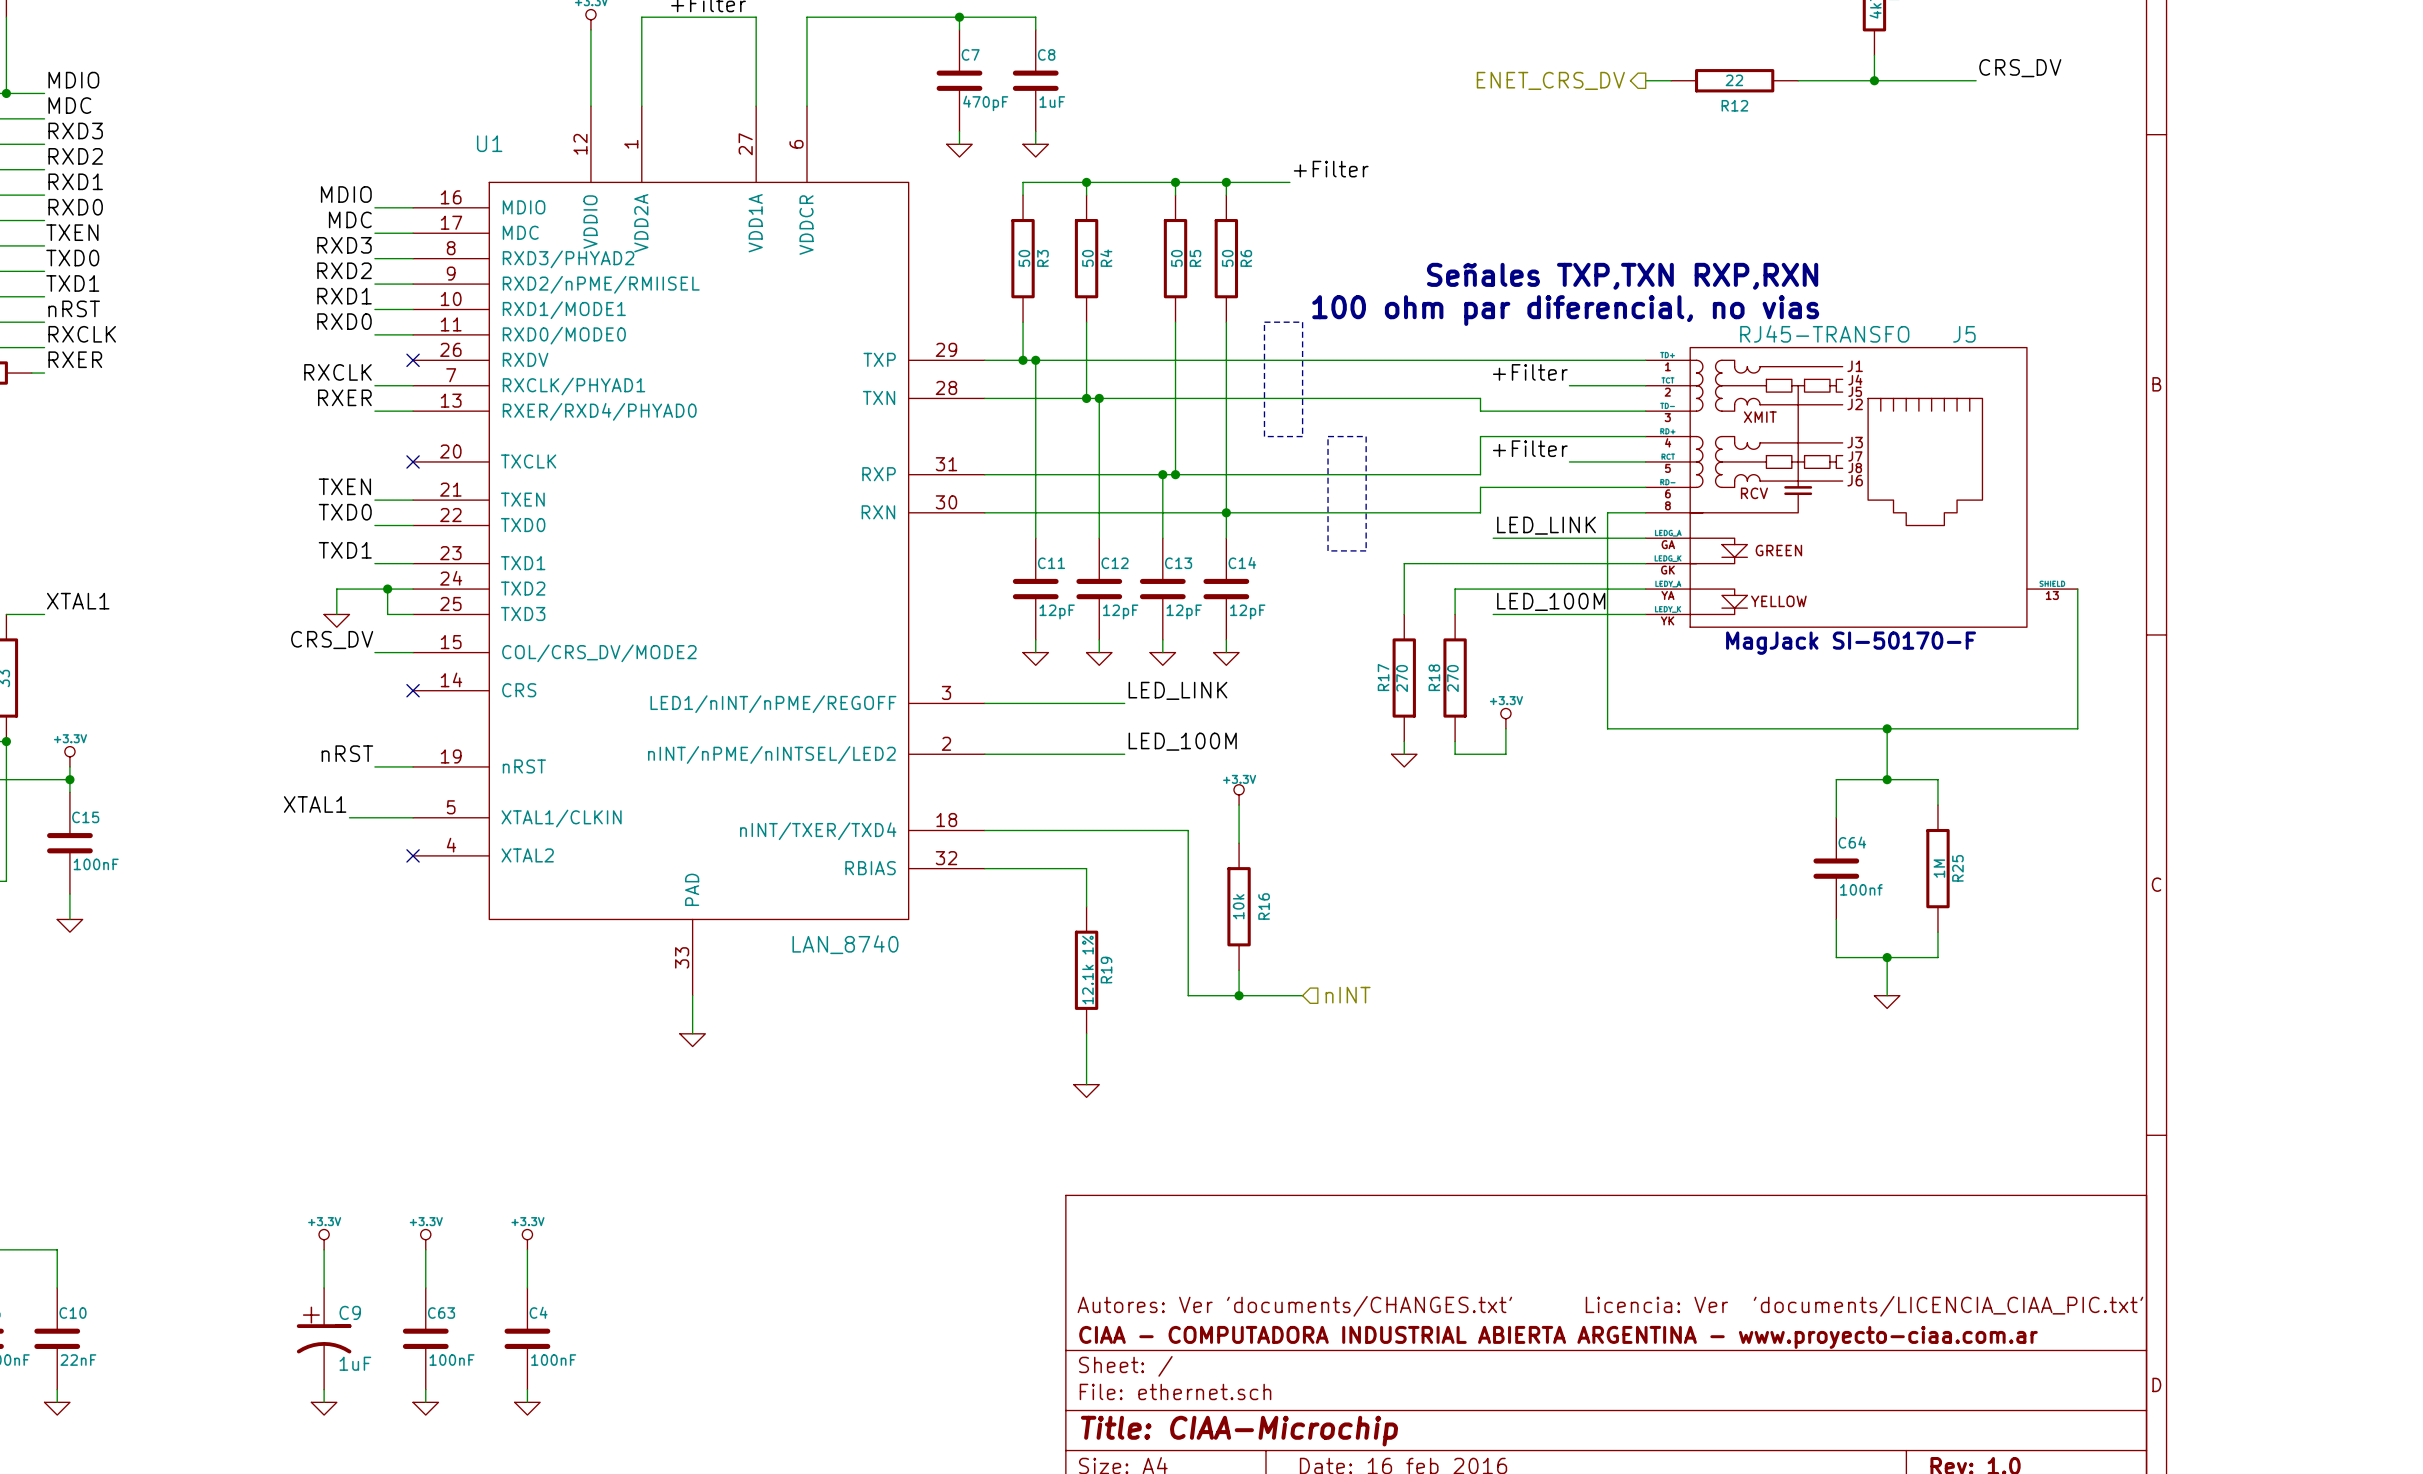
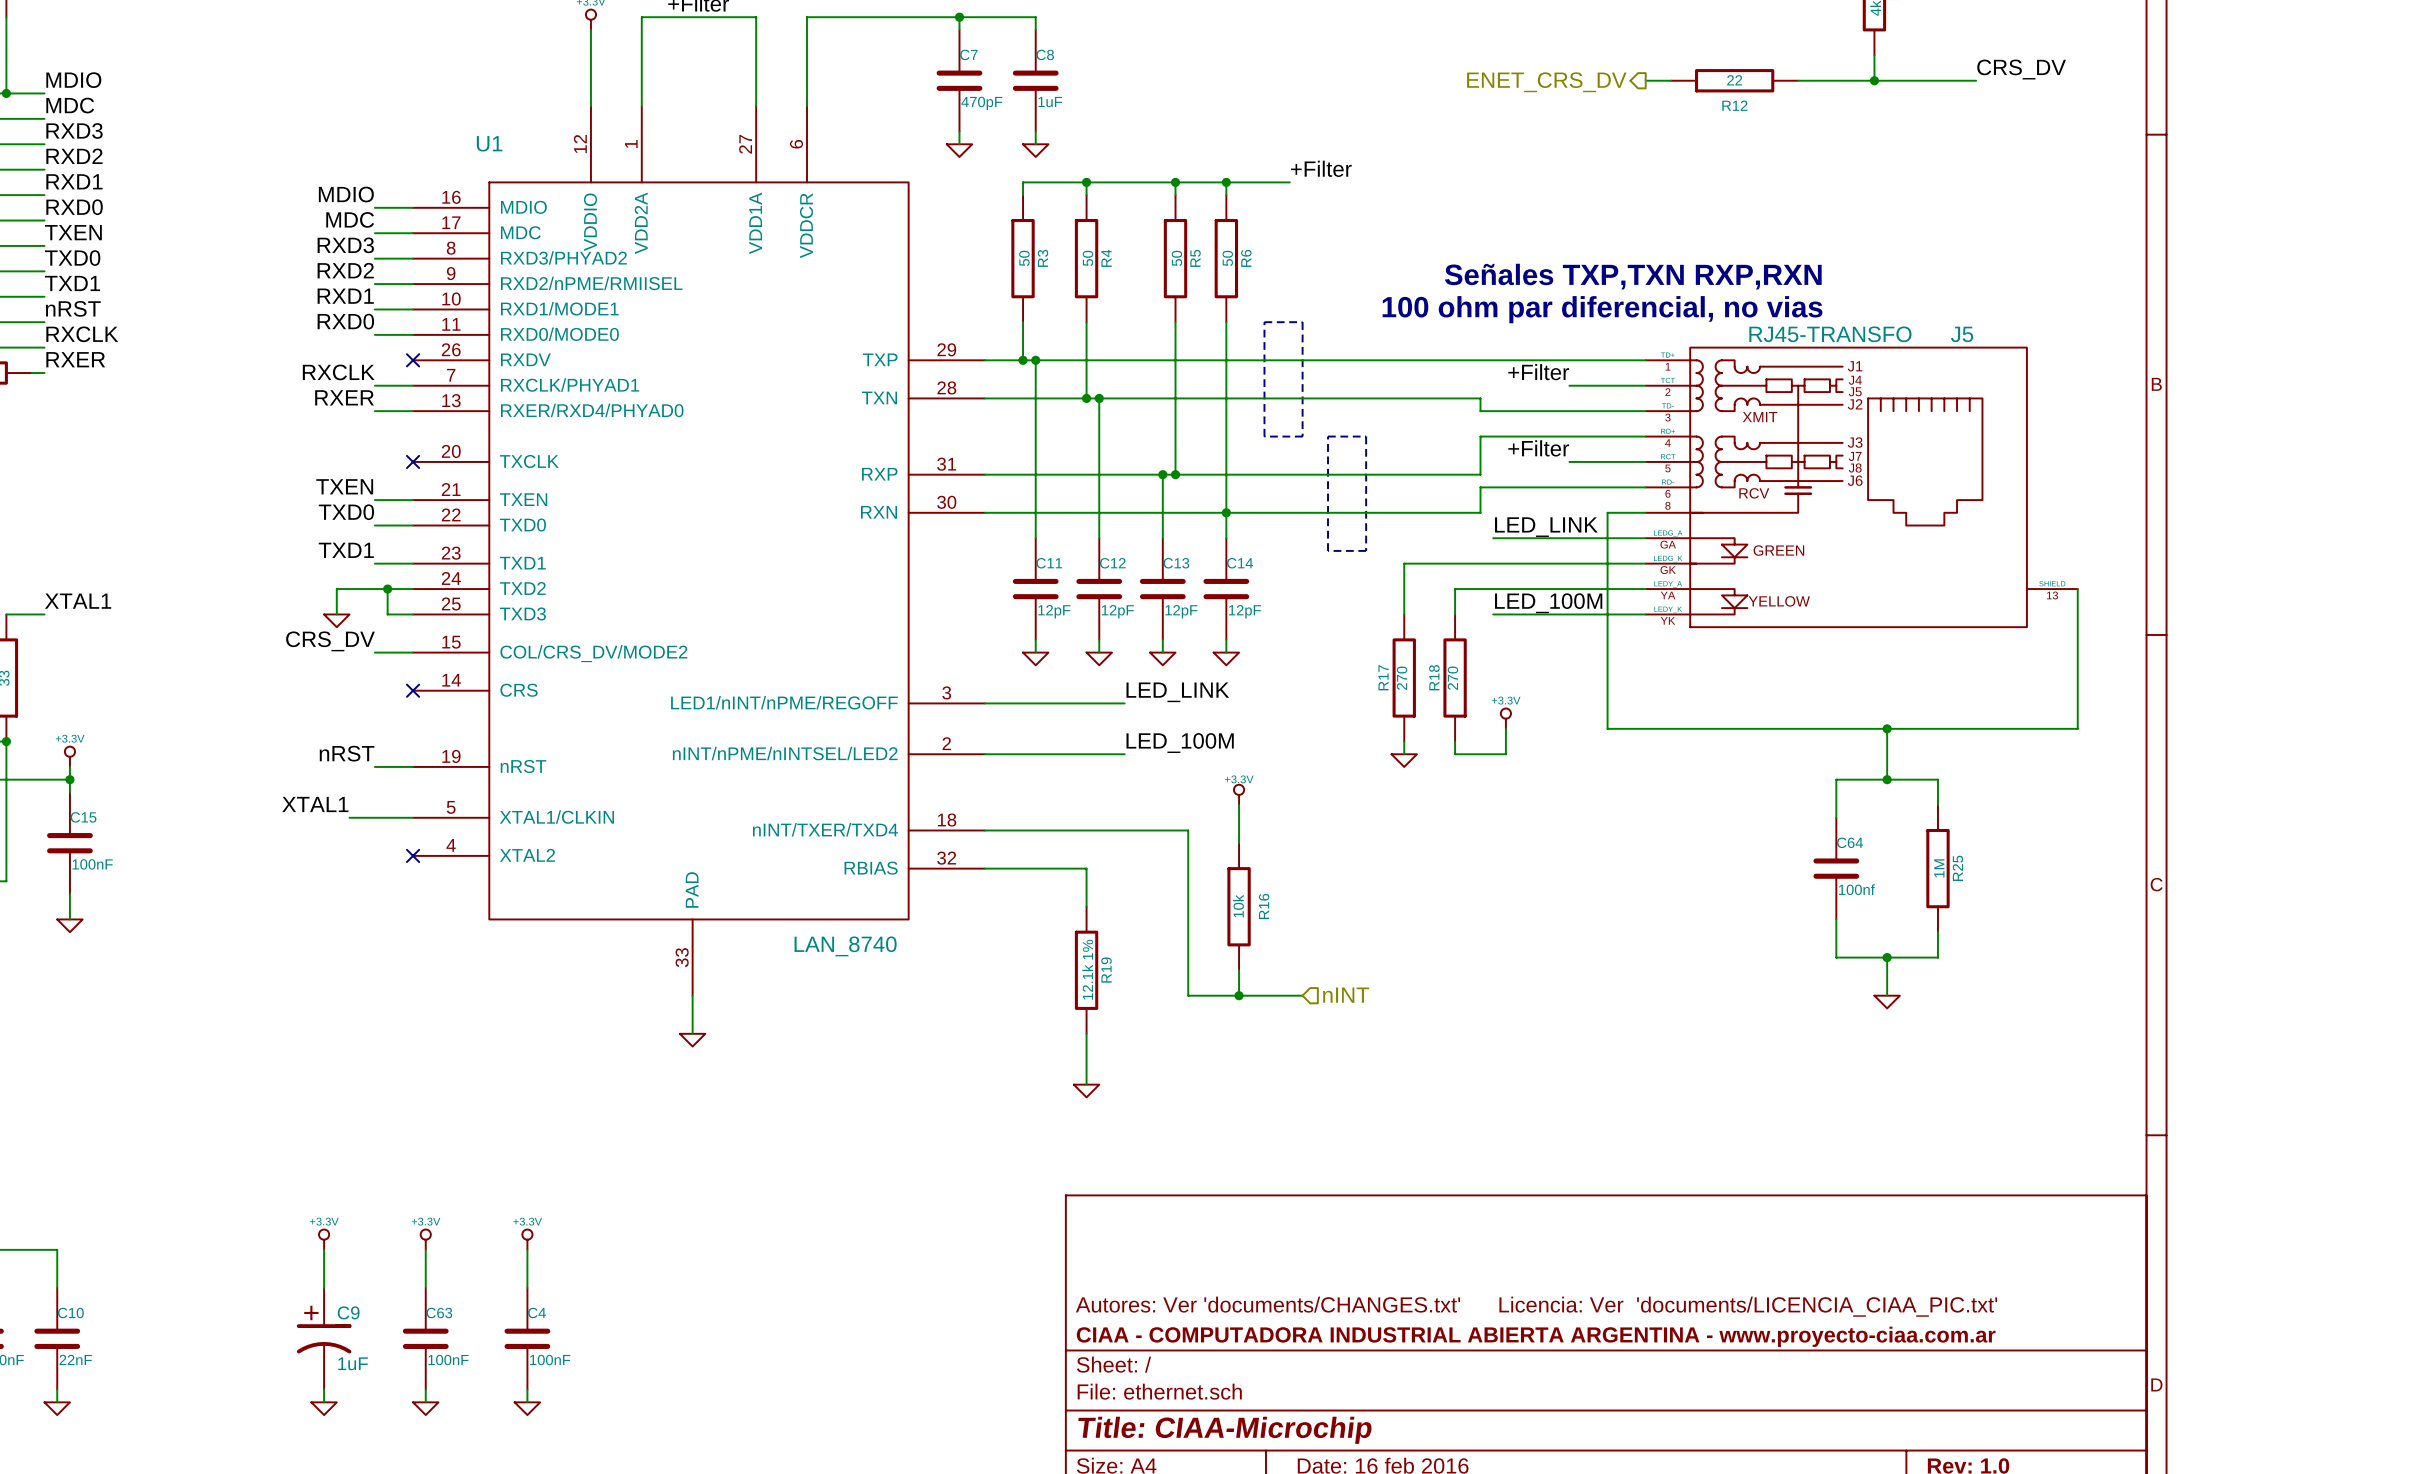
text: MagJack SI-50170-F (1851, 643) -> none

